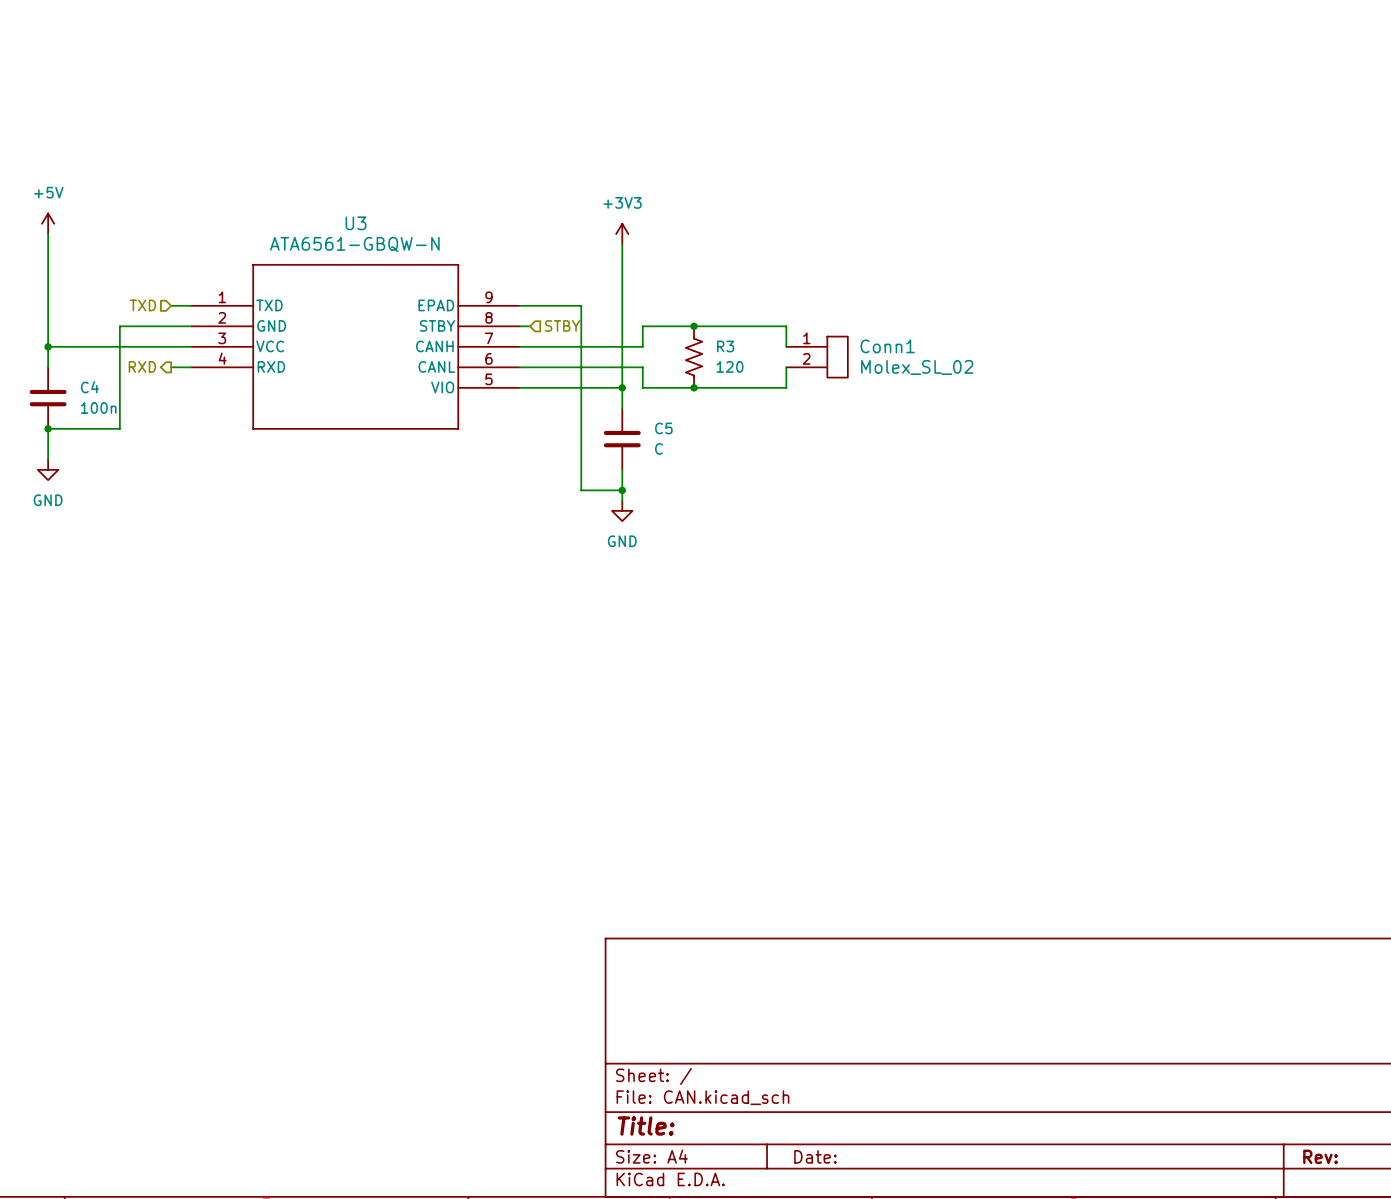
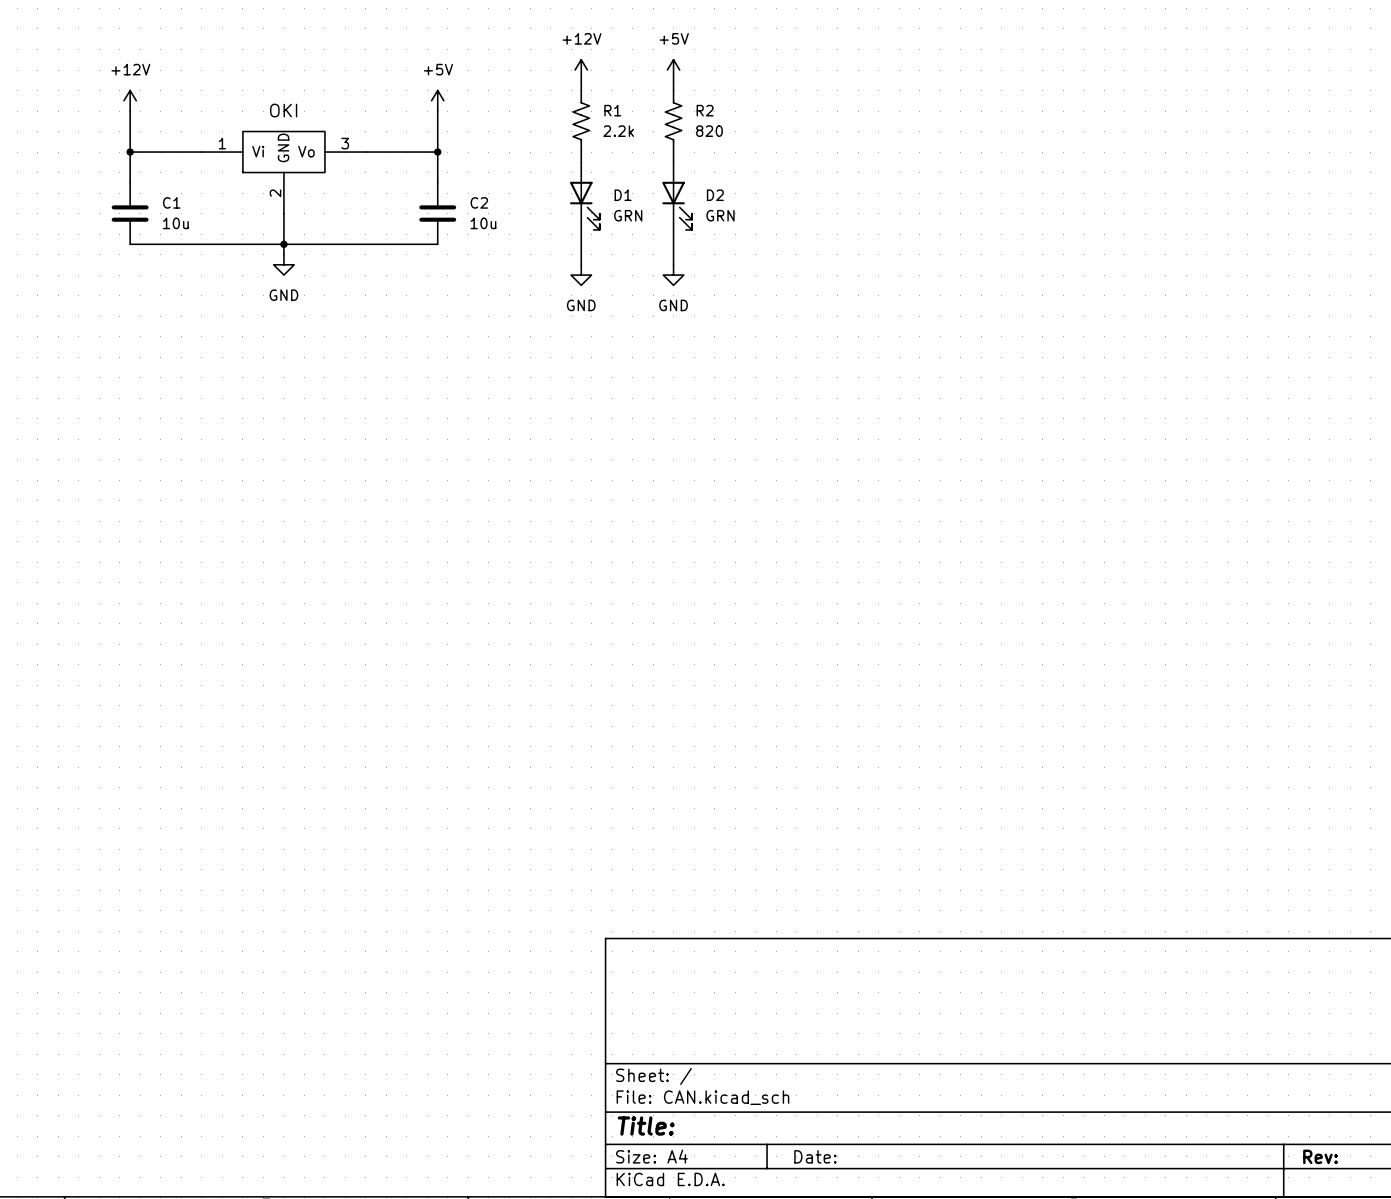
power symbol: none -> +12V (581, 70)
power symbol: none -> +5V (673, 70)
wire: none -> (581, 80) (581, 90)
wire: none -> (673, 80) (673, 90)
power symbol: none -> +12V (130, 100)
power symbol: none -> +5V (437, 100)
wire: none -> (130, 111) (130, 182)
wire: none -> (437, 111) (437, 182)
R1: none -> 2.2k (581, 121)
R2: none -> 820 (673, 121)
wire: none -> (130, 152) (201, 152)
junction: none -> (130, 152)
wire: none -> (365, 152) (437, 152)
junction: none -> (437, 152)
wire: none -> (581, 152) (581, 162)
wire: none -> (673, 152) (673, 162)
part: none -> OKI (283, 172)
D1: none -> GRN (584, 196)
D2: none -> GRN (677, 196)
C1: none -> 10u (130, 213)
wire: none -> (283, 213) (283, 254)
C2: none -> 10u (437, 213)
power symbol: +5V (48, 223) -> none
wire: none -> (581, 223) (581, 264)
wire: none -> (673, 223) (673, 264)
wire: (48, 234) (48, 367) -> none
power symbol: +3V3 (622, 234) -> none
wire: none -> (130, 244) (437, 244)
junction: none -> (283, 244)
wire: (622, 244) (622, 408) -> none
power symbol: none -> GND (283, 264)
power symbol: none -> GND (581, 275)
power symbol: none -> GND (673, 275)
hierarchical label: TXD (142, 305) -> none
wire: (171, 305) (191, 305) -> none
wire: (519, 305) (581, 305) (581, 490) (622, 490) -> none
hierarchical label: STBY (562, 325) -> none
wire: (191, 326) (119, 326) (119, 428) (48, 428) (48, 459) -> none
wire: (519, 326) (530, 326) -> none
junction: (694, 326) -> none
wire: (48, 346) (191, 346) -> none
junction: (48, 346) -> none
U3: ATA6561-GBQW-N (355, 346) -> none
wire: (519, 346) (642, 346) (642, 326) (786, 326) (786, 346) -> none
R3: 120 (694, 357) -> none
Conn1: Molex_SL_02 (817, 357) -> none
hierarchical label: RXD (142, 366) -> none
wire: (171, 367) (191, 367) -> none
wire: (519, 367) (642, 367) (642, 387) (786, 387) (786, 367) -> none
wire: (519, 387) (622, 387) -> none
junction: (622, 387) -> none
junction: (694, 387) -> none
C4: 100n (48, 398) -> none
junction: (48, 428) -> none
C5: C (622, 439) -> none
power symbol: GND (48, 469) -> none
wire: (622, 469) (622, 500) -> none
junction: (622, 490) -> none
power symbol: GND (622, 510) -> none

